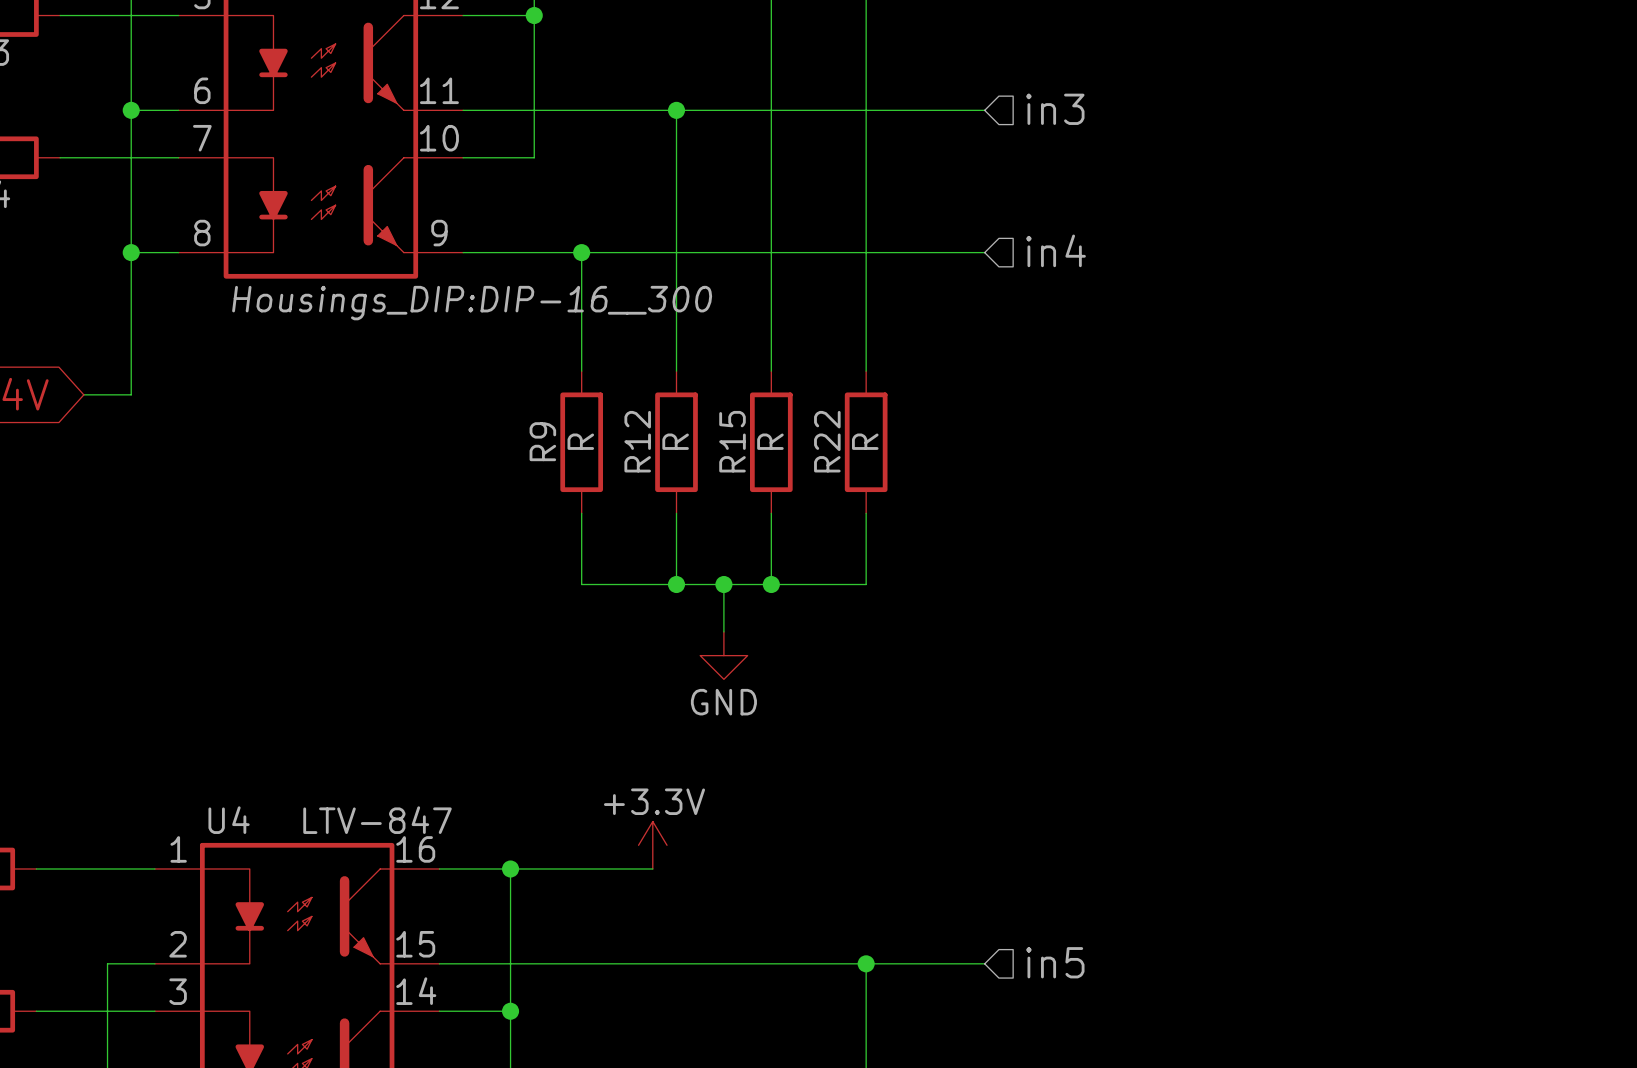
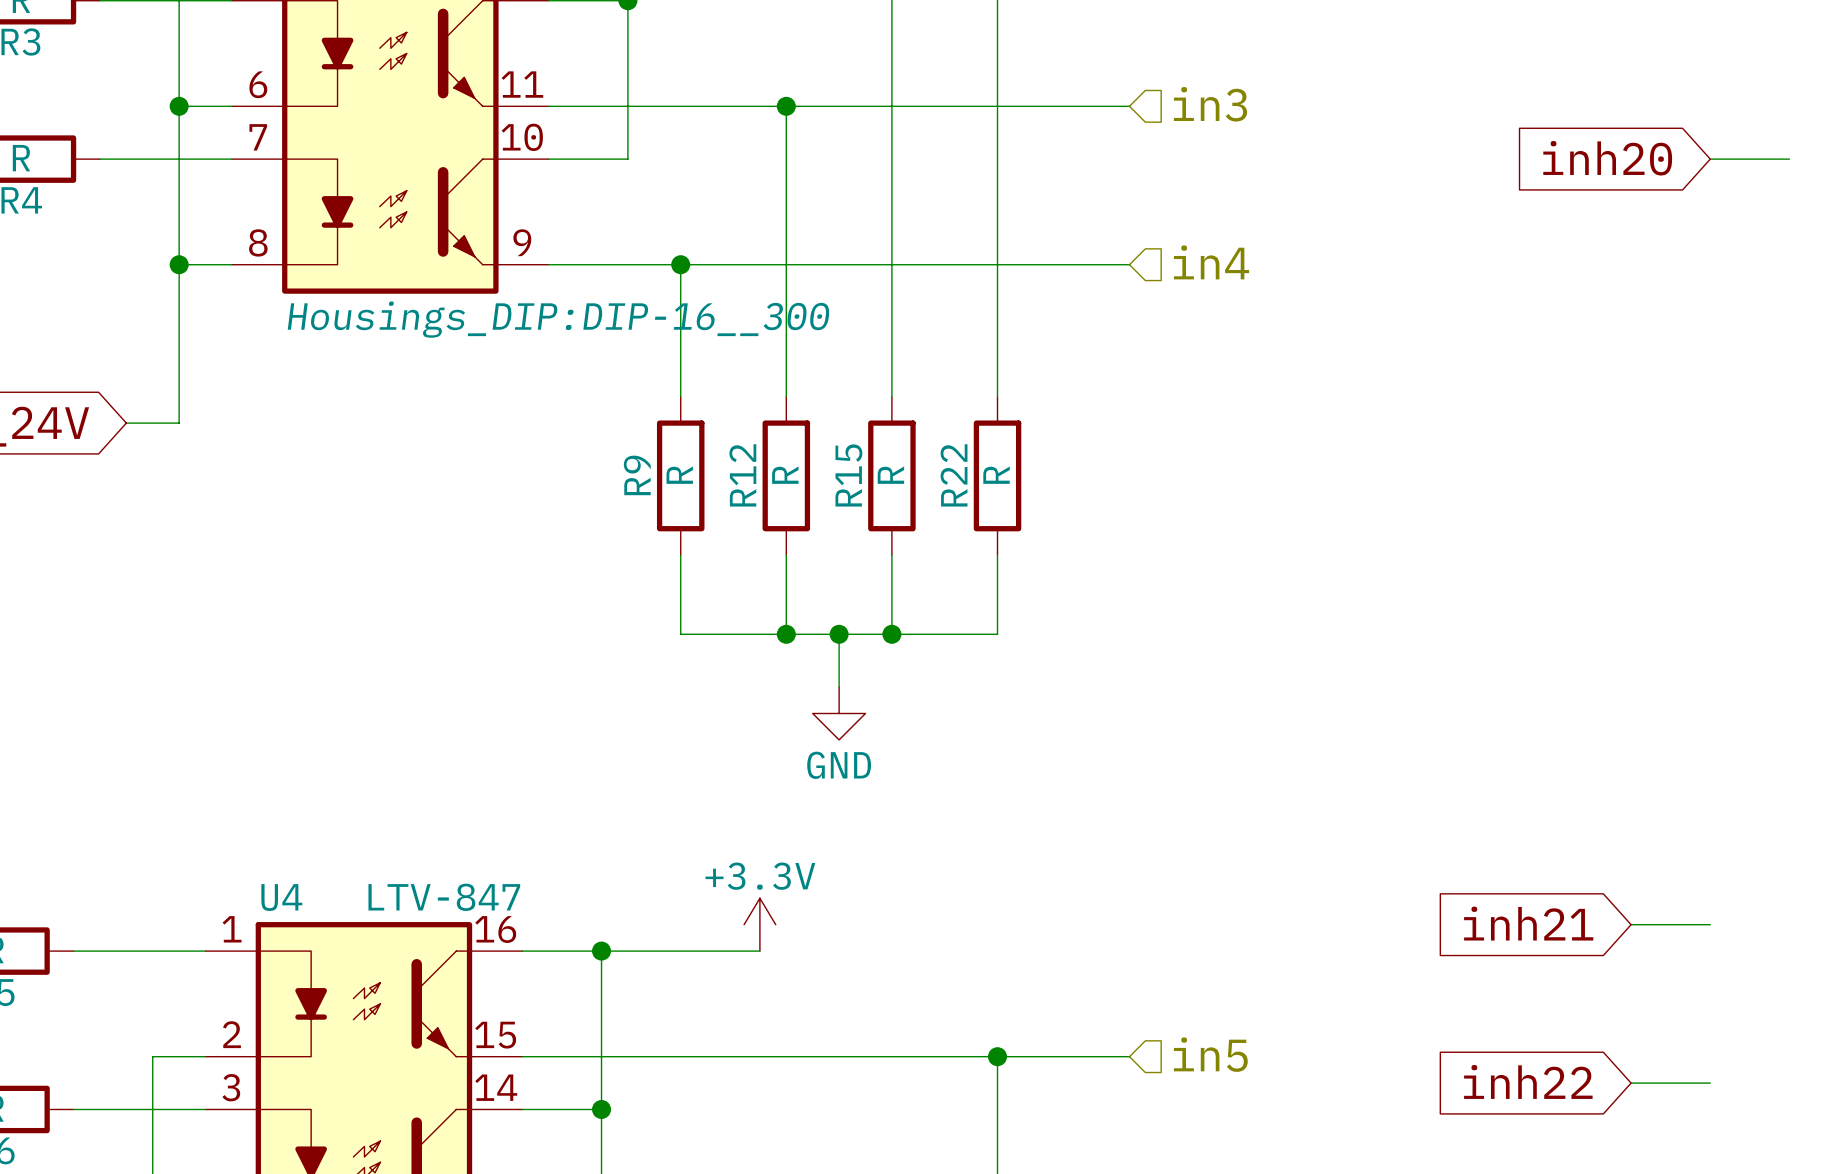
global label: none -> inh20 (1607, 158)
wire: none -> (1710, 159) (1789, 159)
global label: none -> inh21 (1528, 923)
wire: none -> (1631, 924) (1710, 924)
global label: none -> inh22 (1528, 1081)
wire: none -> (1631, 1083) (1710, 1083)

